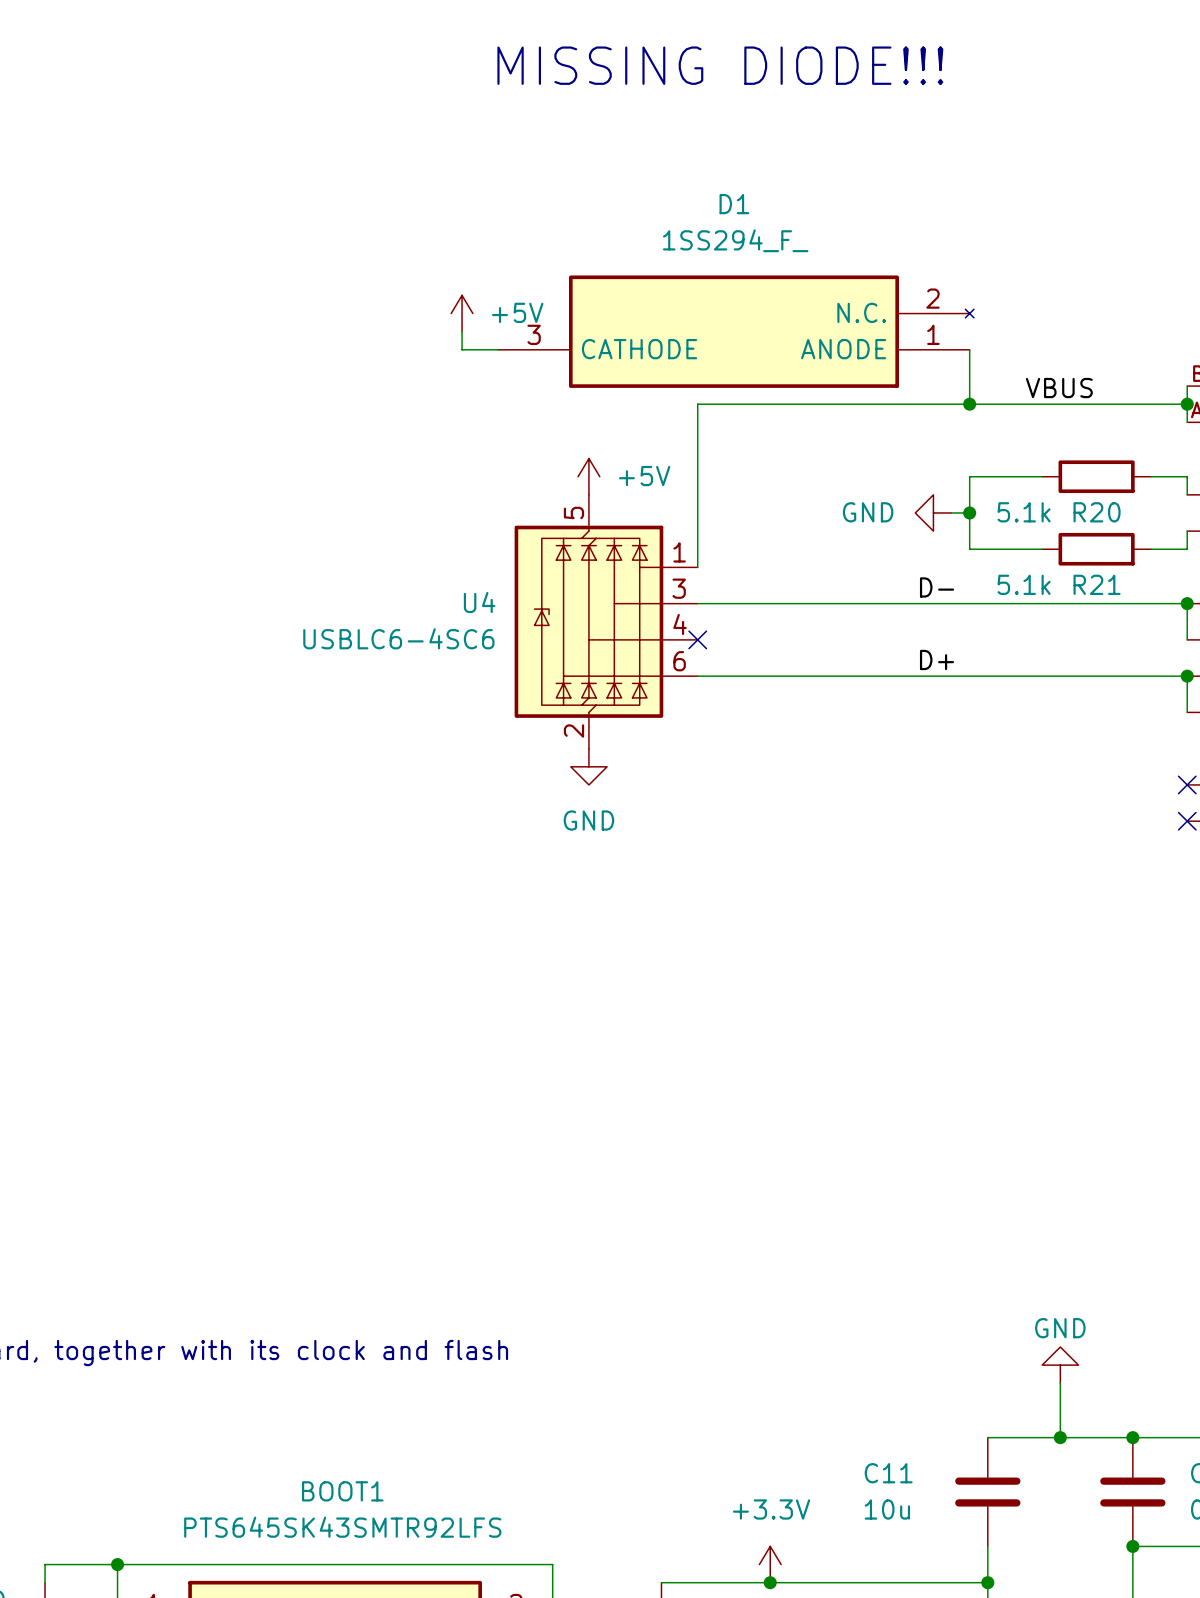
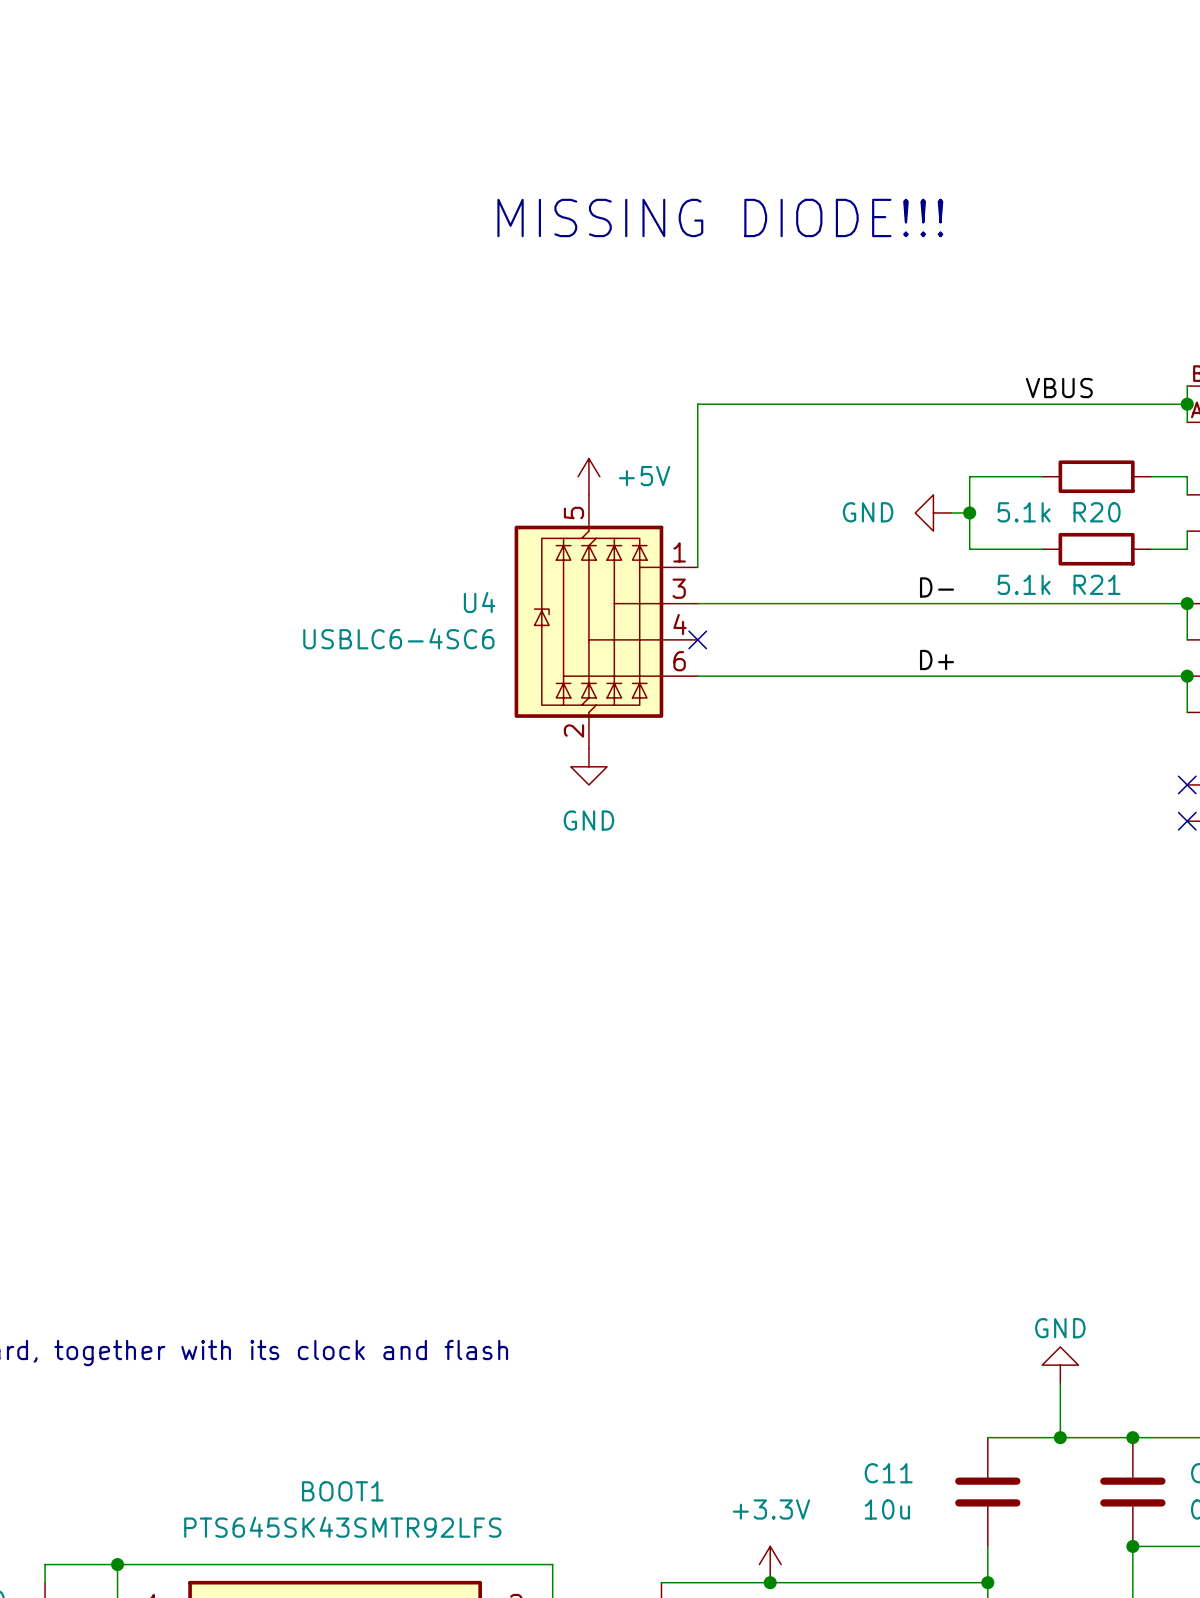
text position: MISSING DIODE!!! (720, 65) -> MISSING DIODE!!! (720, 217)
power symbol: +5V (462, 313) -> none
wire: (462, 331) (462, 349) (498, 349) -> none
D1: 1SS294_F_ (736, 331) -> none
wire: (969, 349) (969, 404) -> none
junction: (969, 404) -> none

